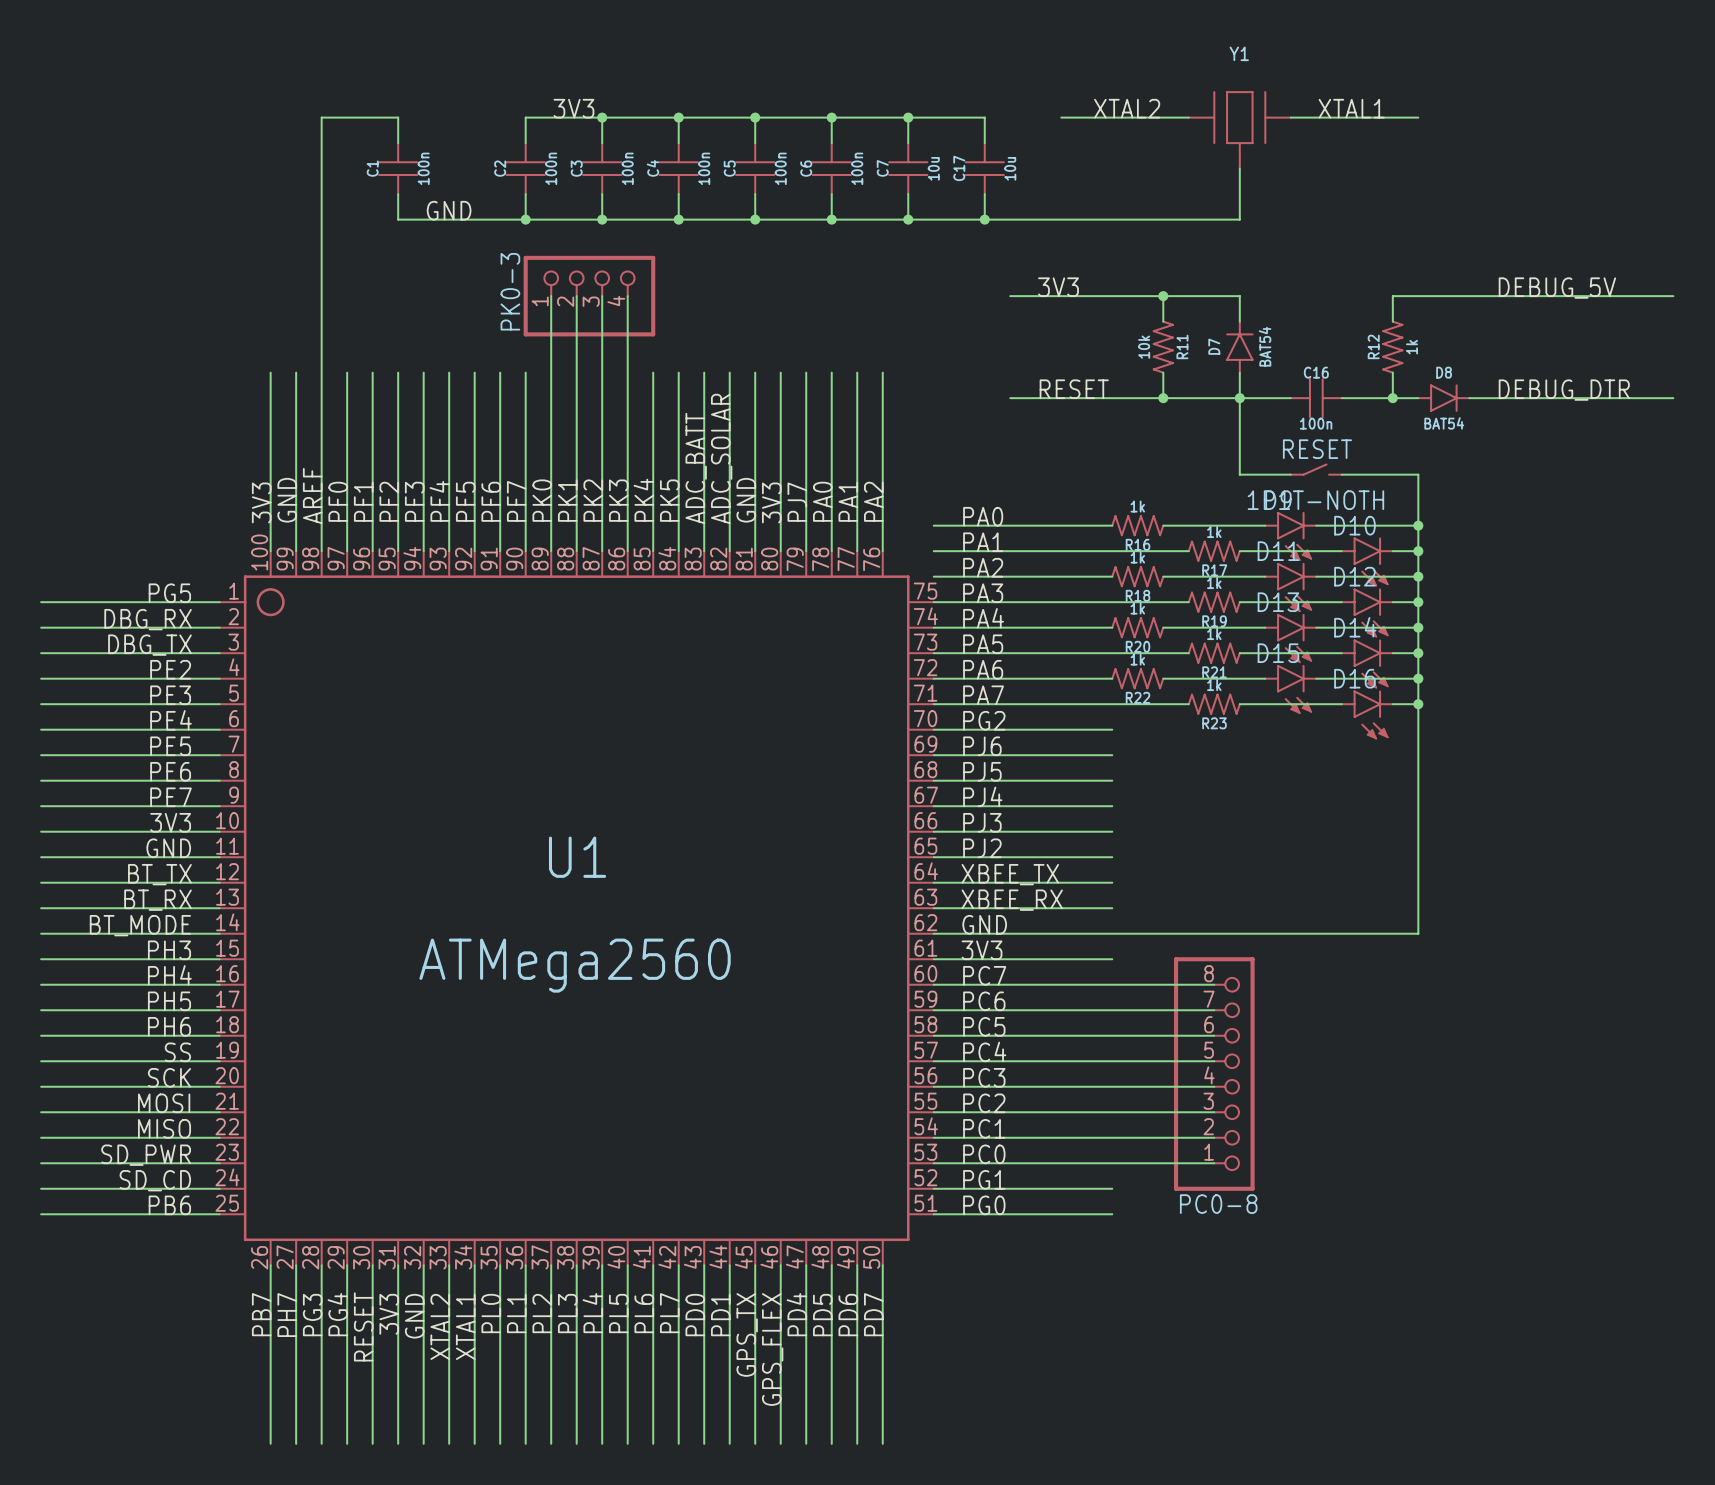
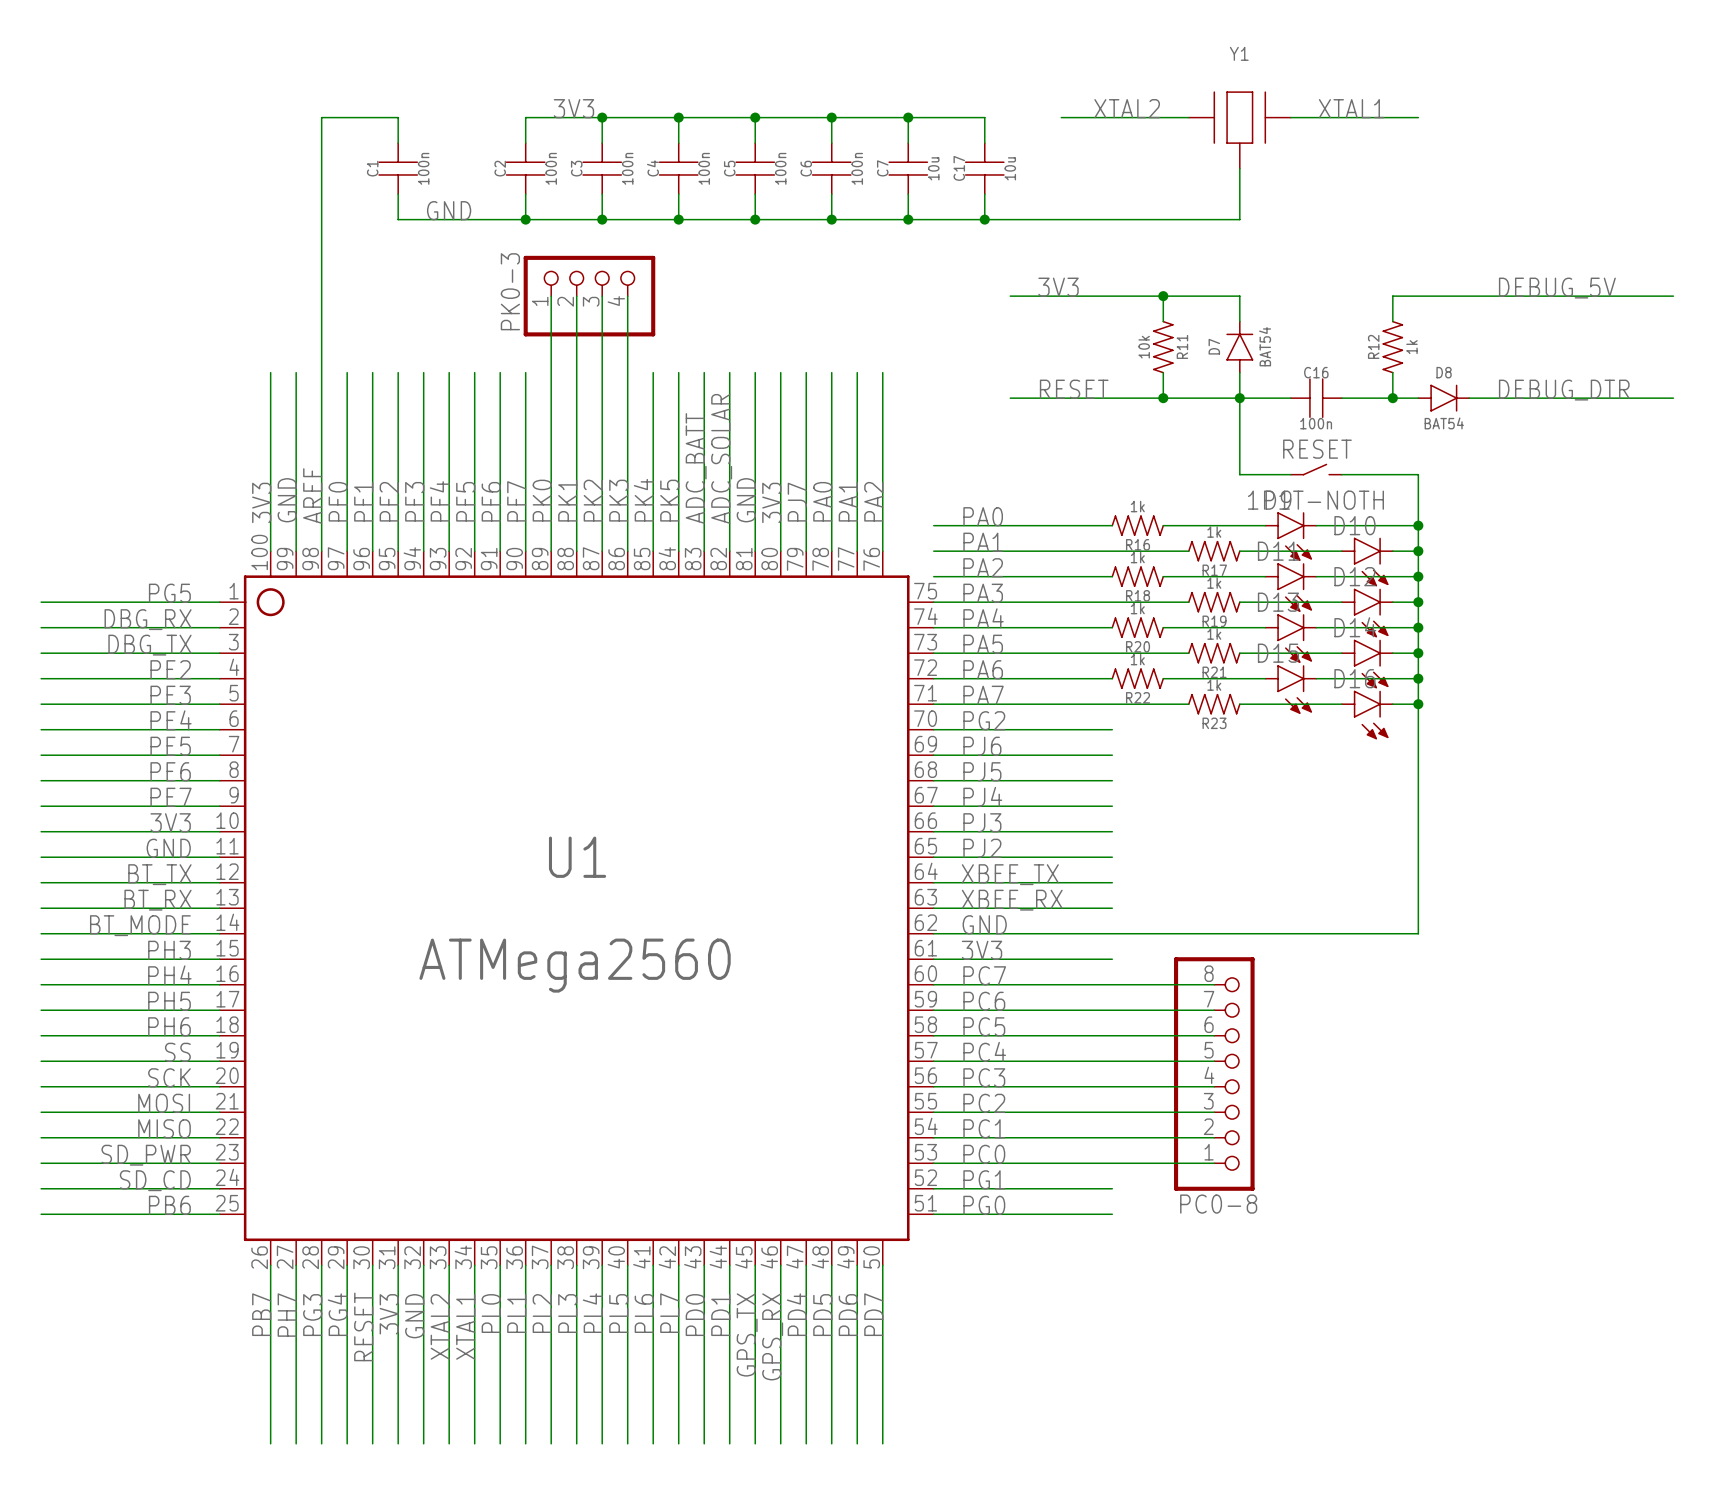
label: GPS_FLEX (772, 1349) -> GPS_RX (772, 1336)

